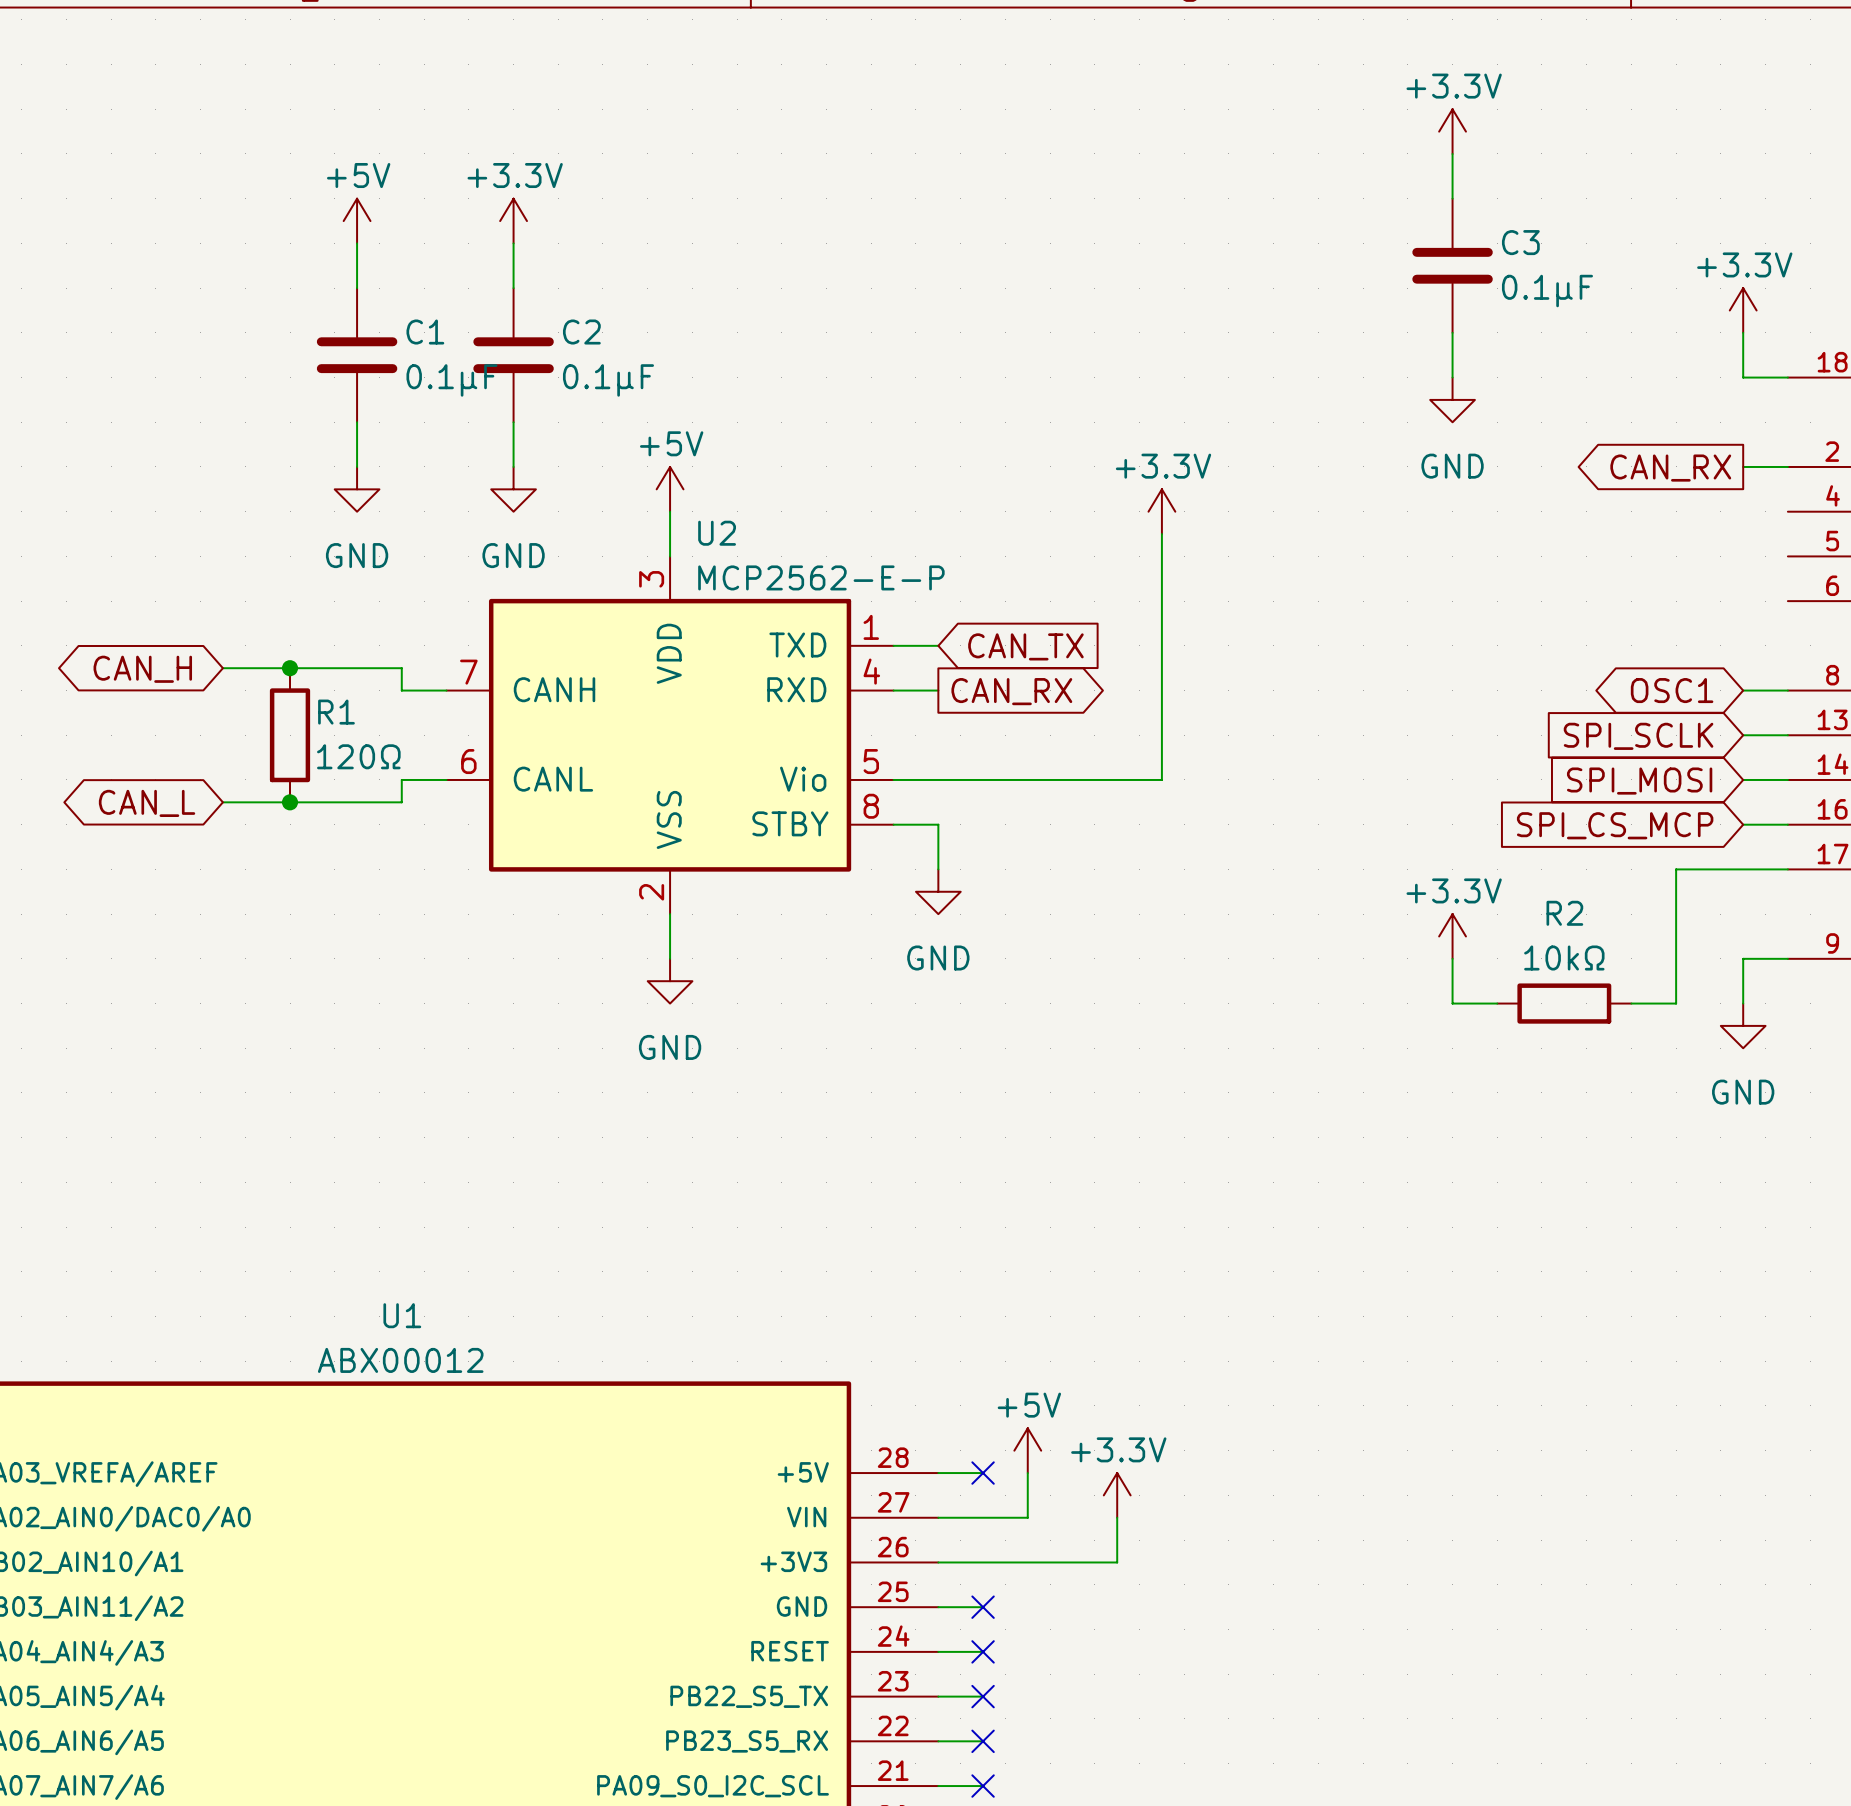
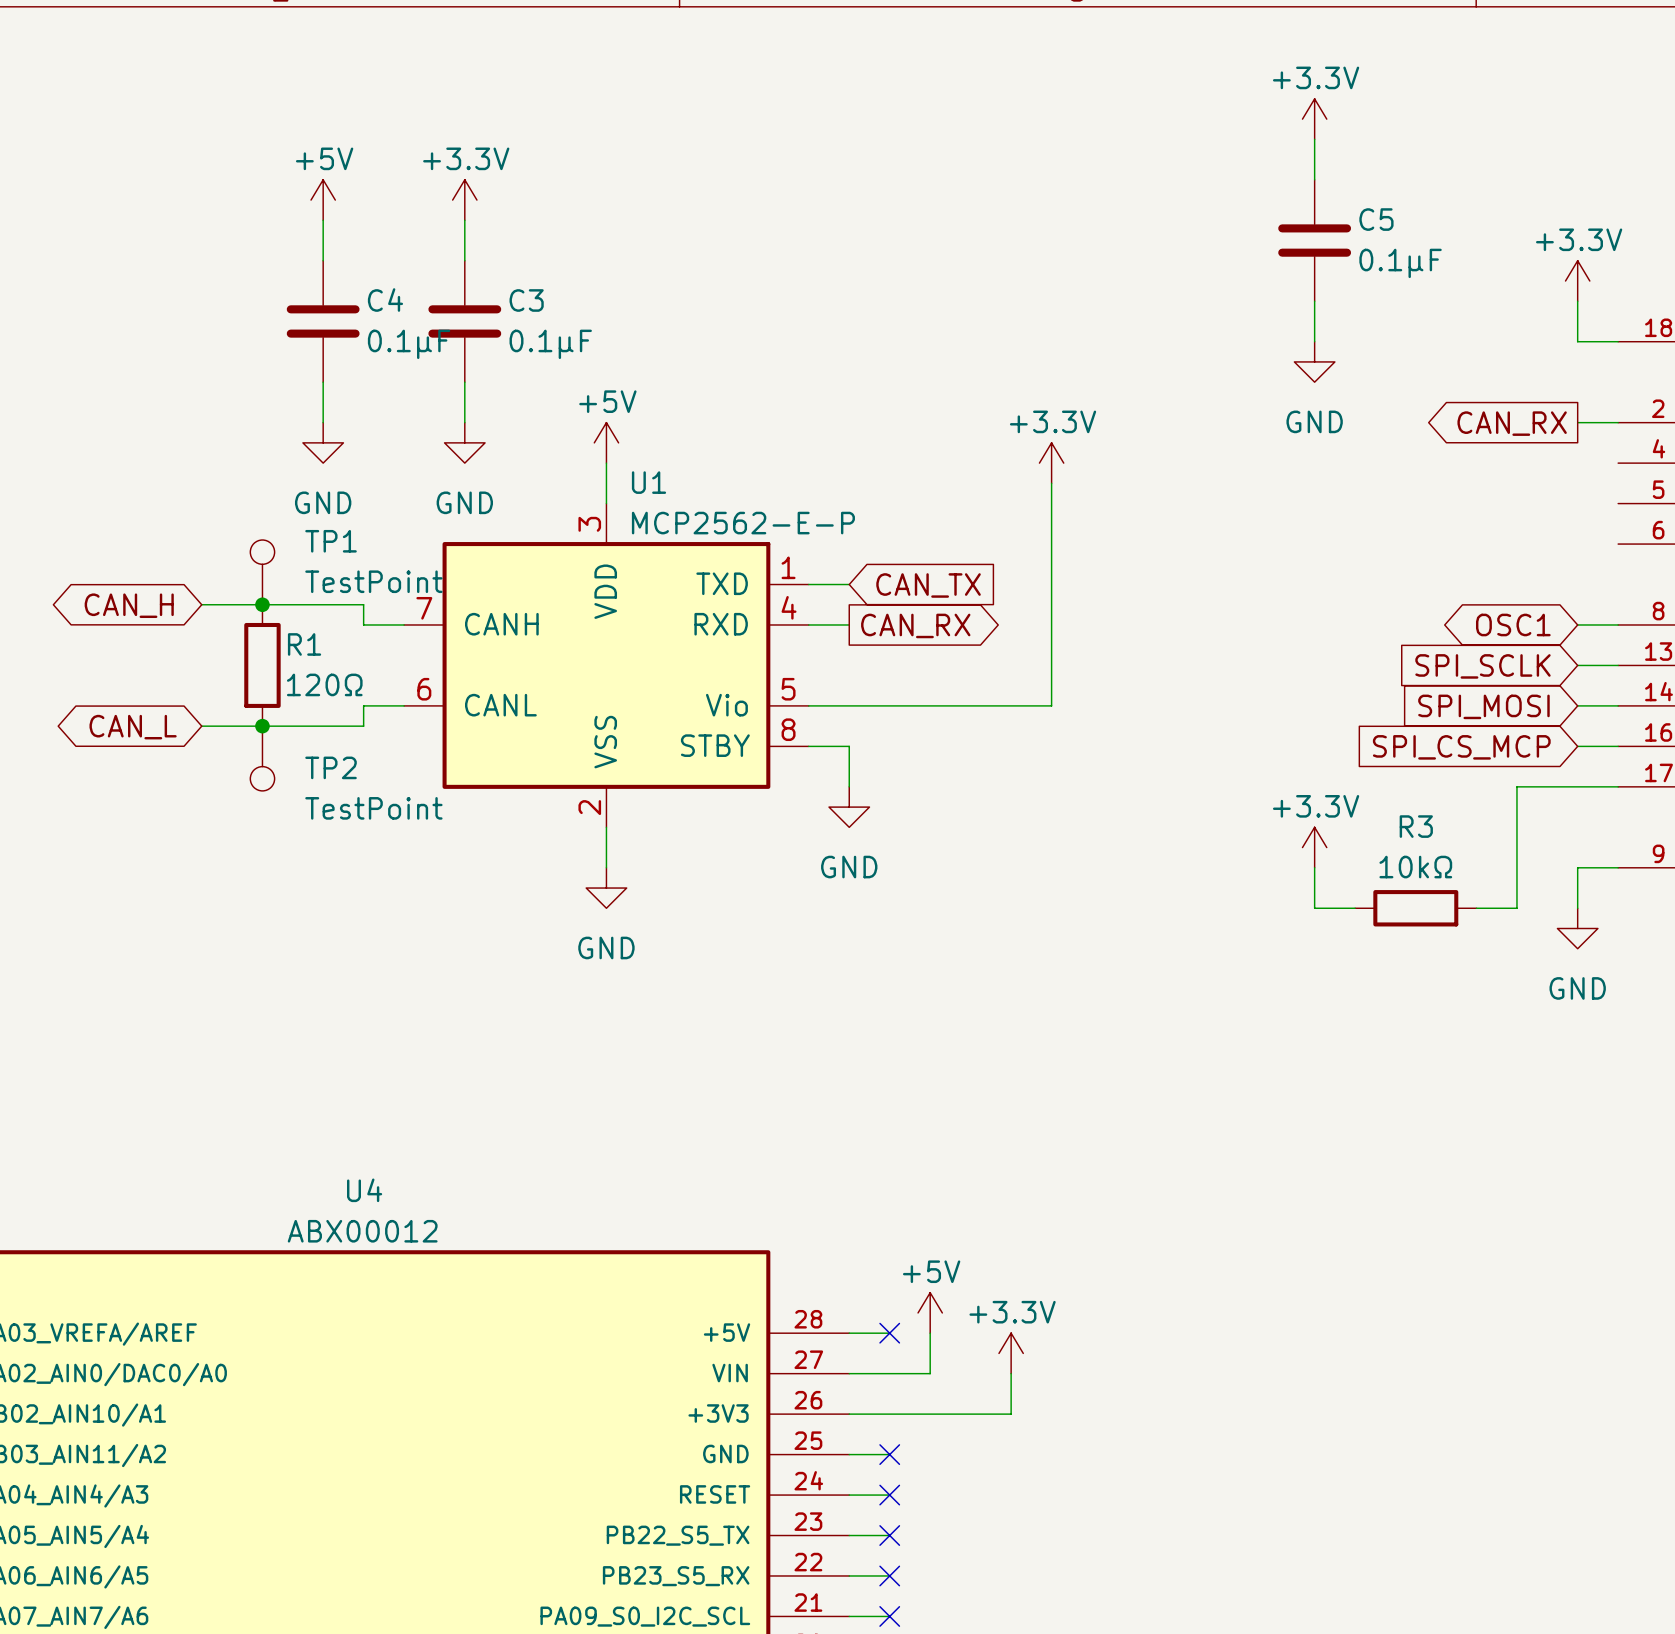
C3 name: C3 (1520, 242) -> C5 (1376, 219)
C1 name: C1 (425, 332) -> C4 (385, 300)
C2 name: C2 (581, 332) -> C3 (526, 300)
U2 name: U2 (717, 533) -> U1 (648, 482)
TP1: none -> TestPoint (262, 572)
TP2: none -> TestPoint (262, 758)
R2 name: R2 (1564, 913) -> R3 (1416, 826)
U1 name: U1 (402, 1315) -> U4 (364, 1190)

